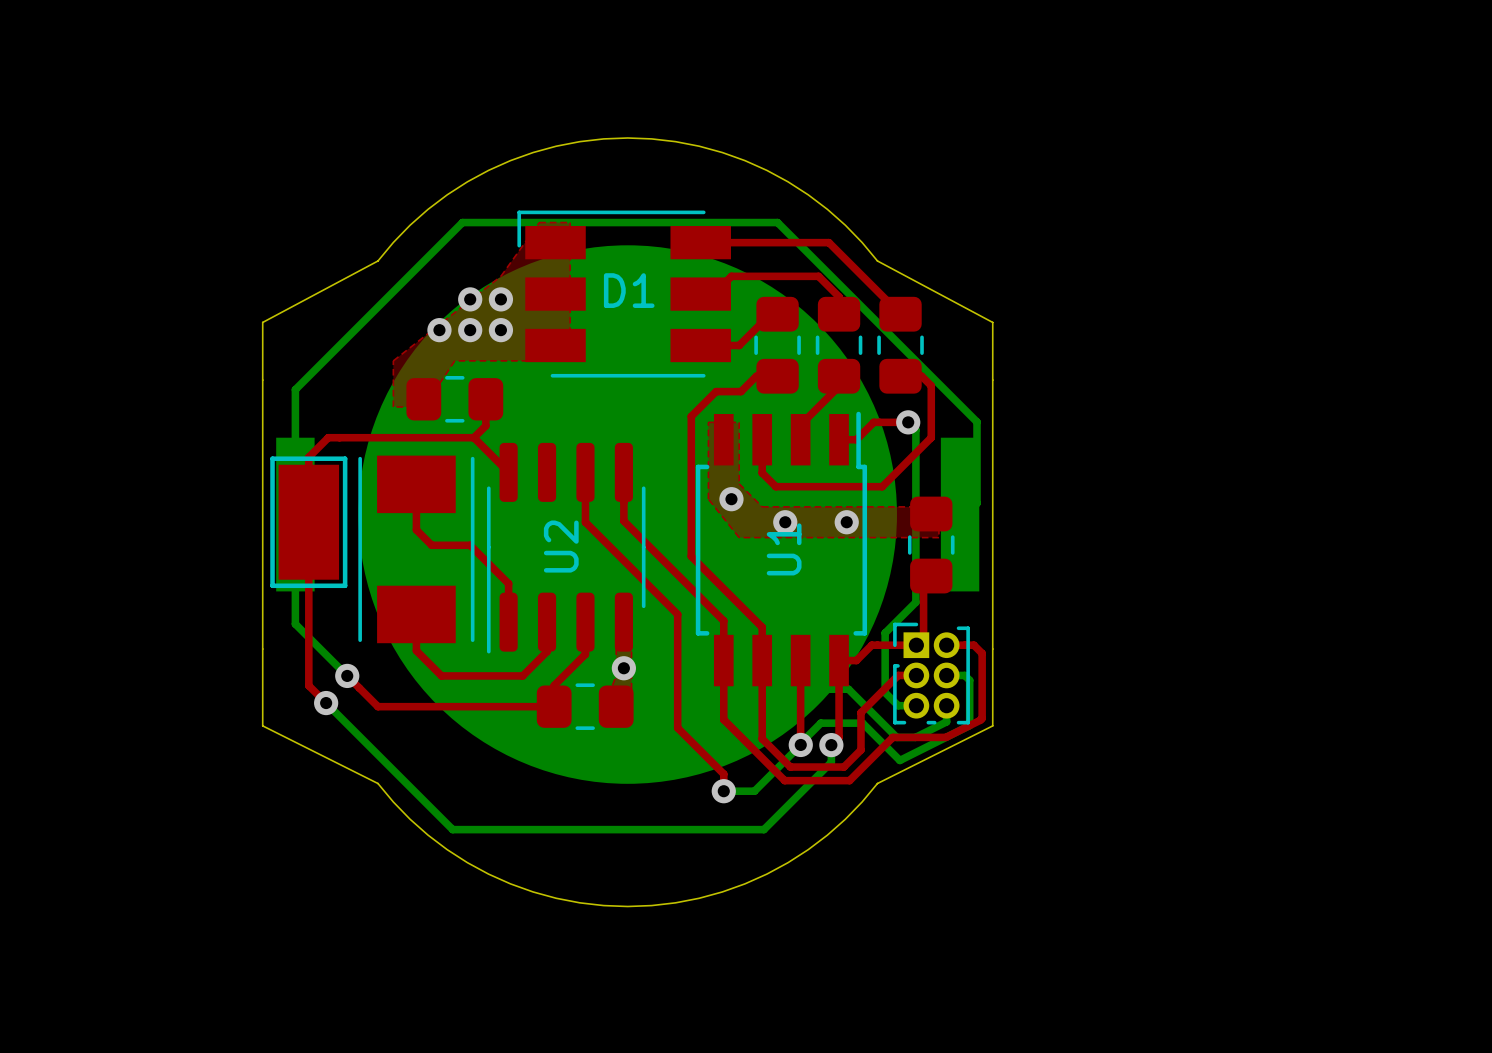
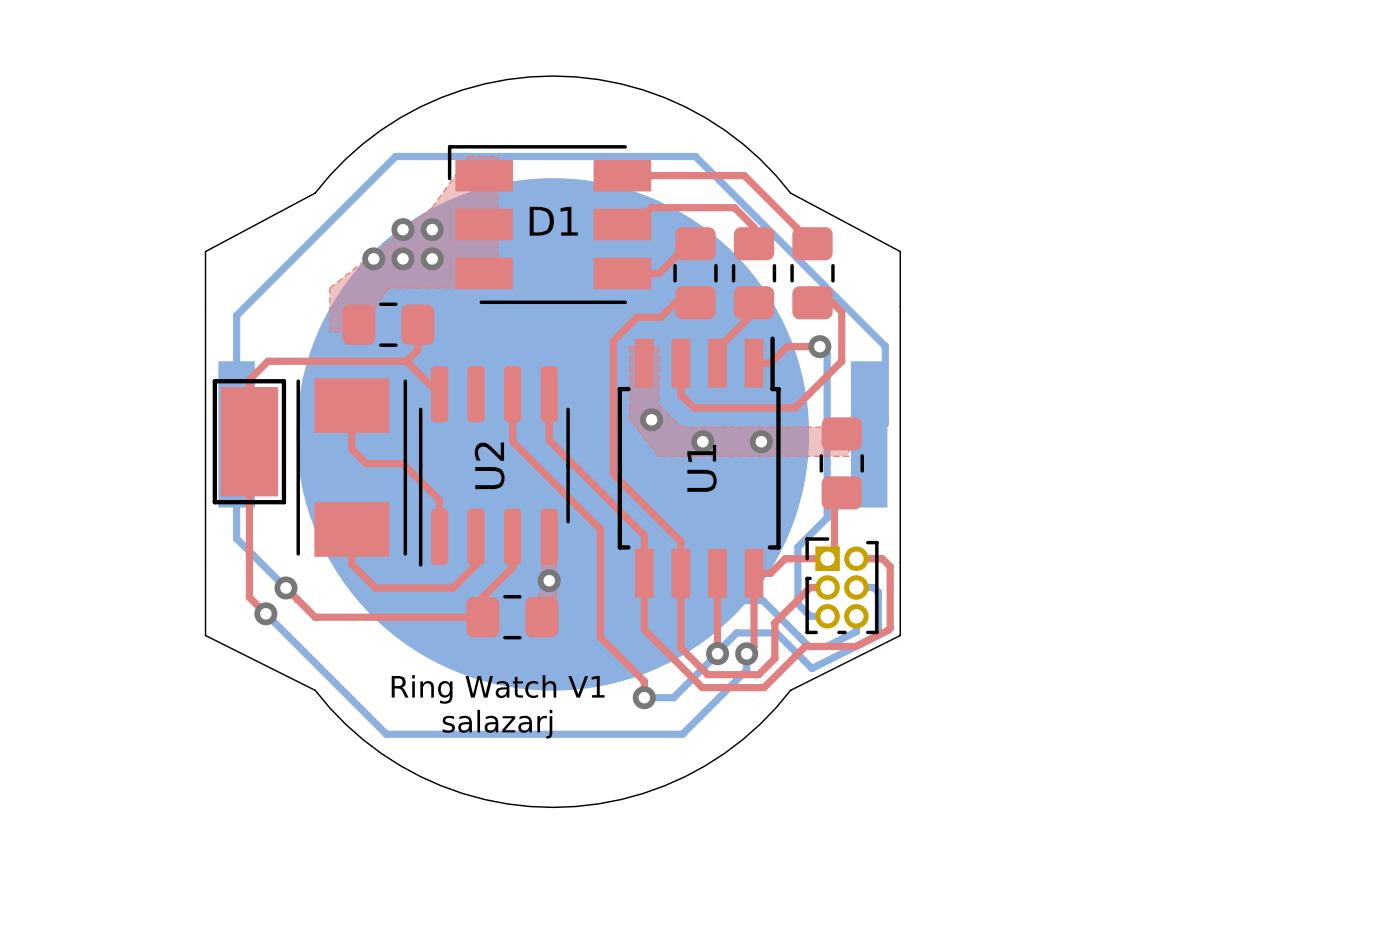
text: none -> Ring Watch V1 (498, 689)
text: none -> salazarj (497, 724)

